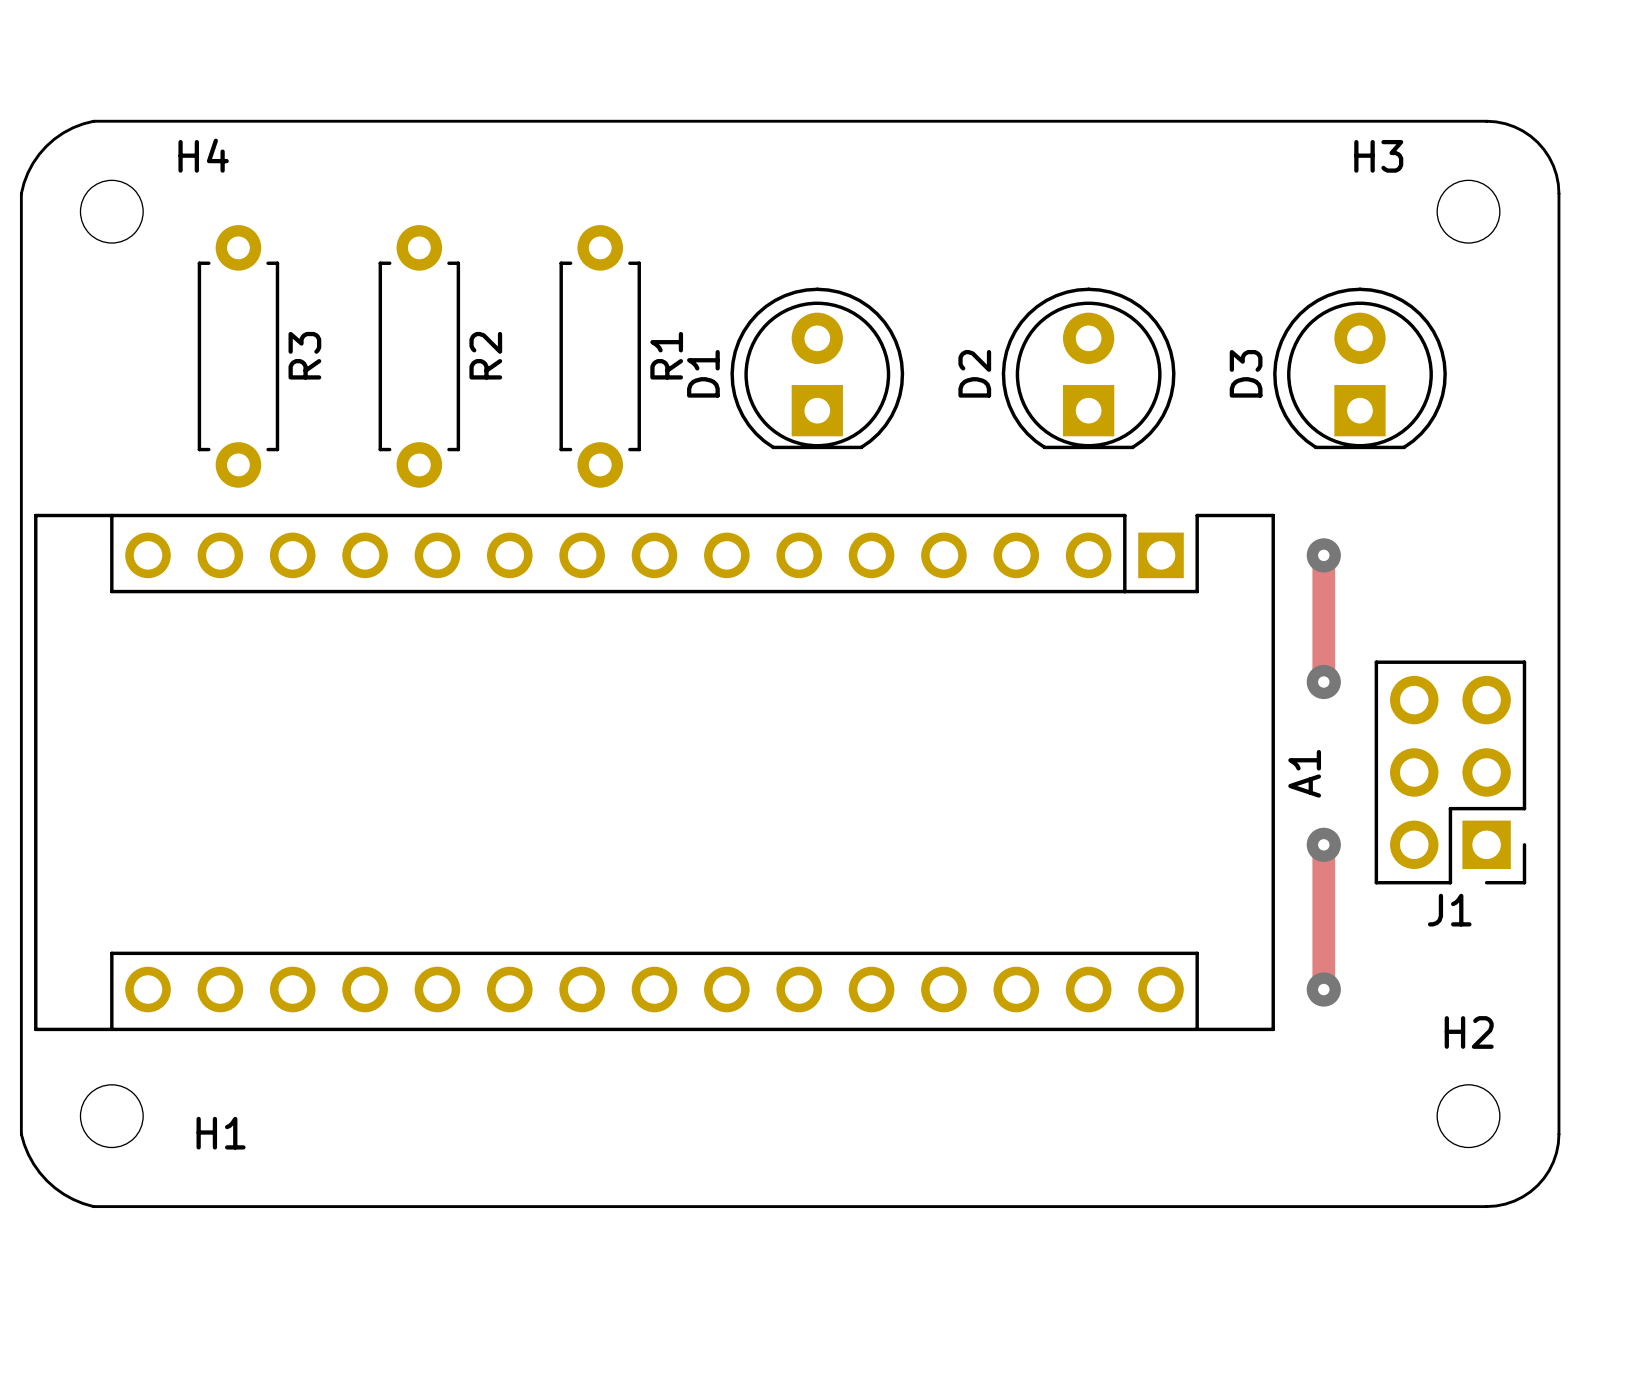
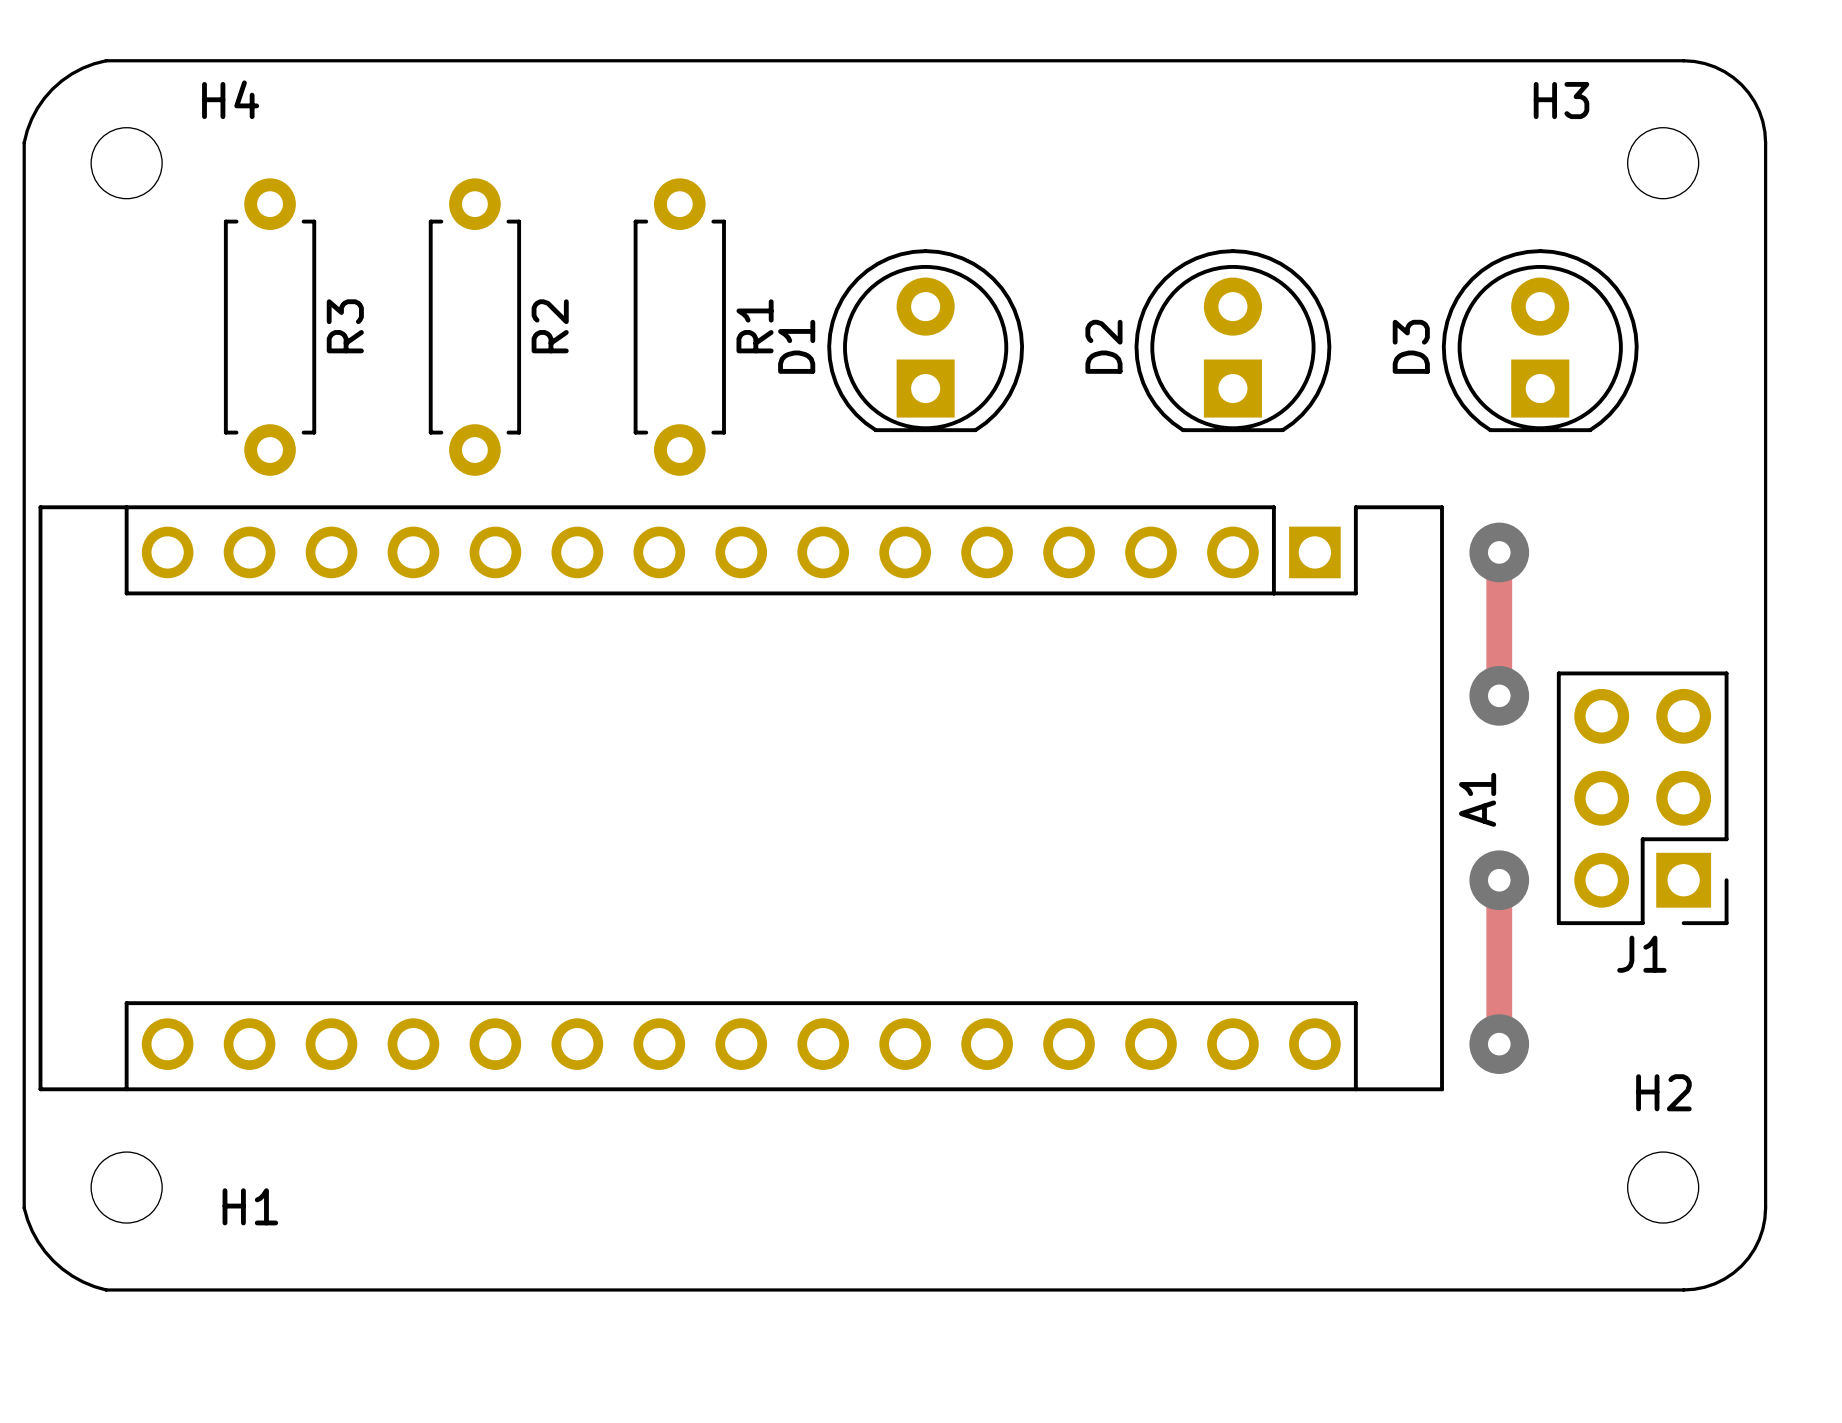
via size: [1306, 538, 1341, 573] -> [1469, 522, 1530, 583]
via size: [1306, 664, 1341, 700] -> [1469, 666, 1530, 726]
via size: [1306, 827, 1341, 862] -> [1469, 850, 1530, 911]
via size: [1306, 972, 1341, 1007] -> [1469, 1014, 1530, 1074]

